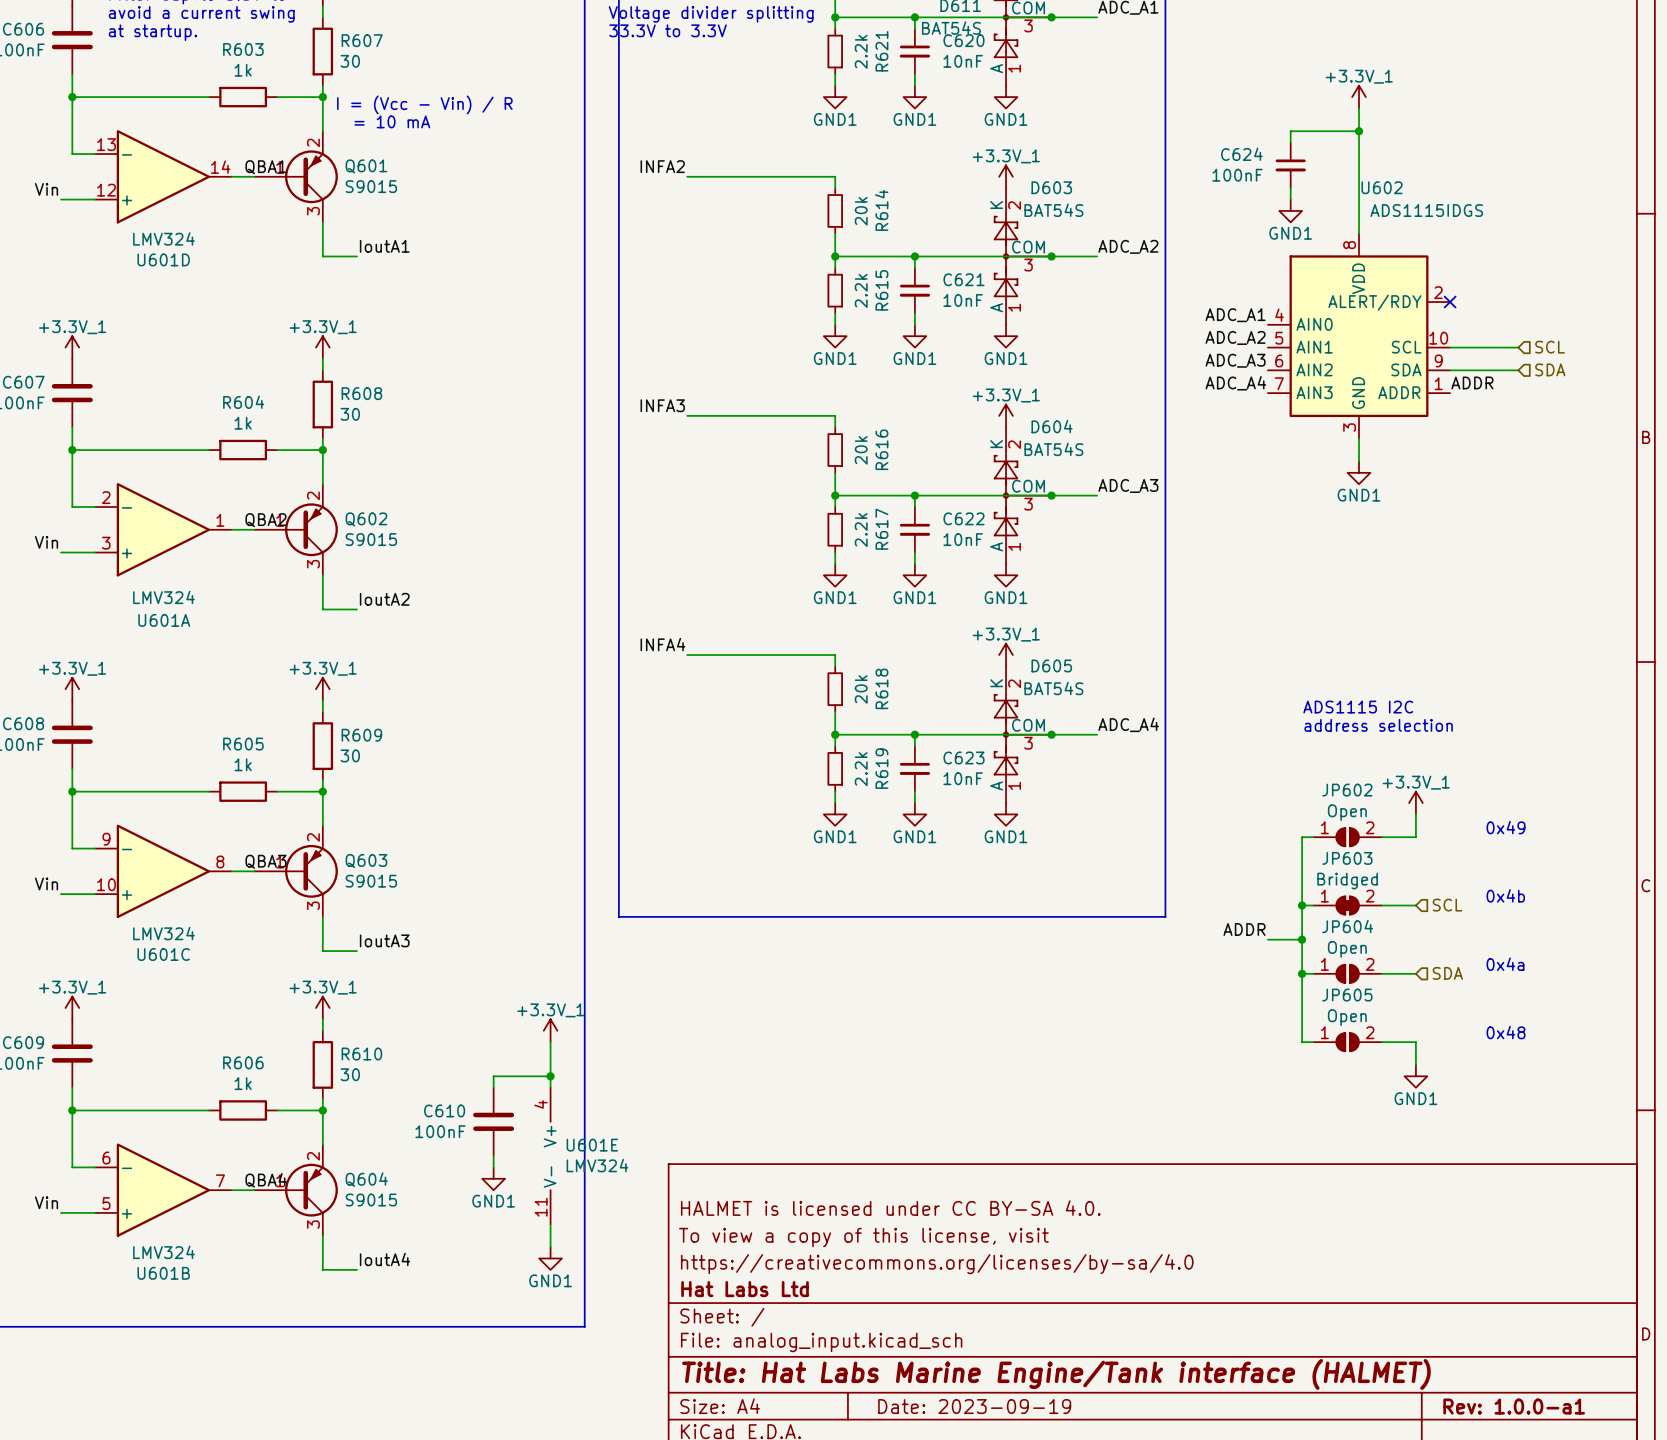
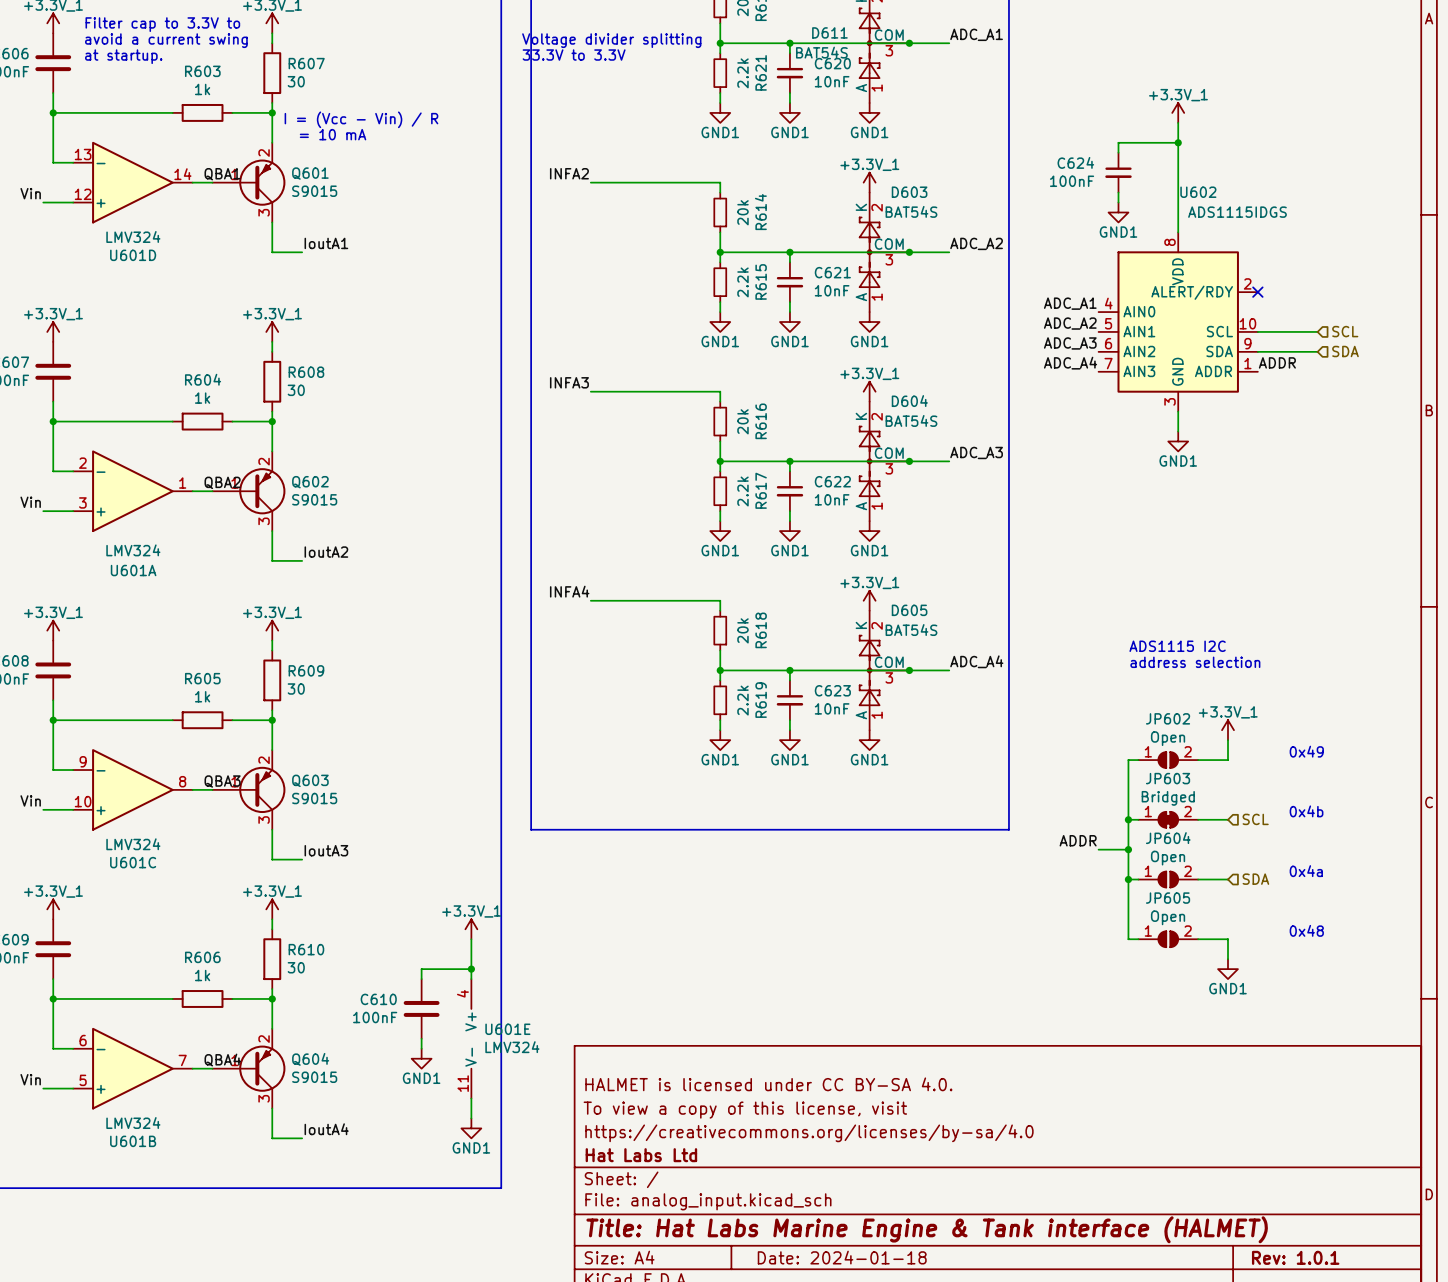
title block: Title: Hat Labs Marine Engine/Tank interface (HALMET) (1056, 1374) -> Title: Hat Labs Marine Engine & Tank interface (HALMET) (927, 1229)
title block: Date: 2023-09-19 (974, 1406) -> Date: 2024-01-18 (842, 1257)
title block: Rev: 1.0.0-a1 (1514, 1406) -> Rev: 1.0.1 (1295, 1257)

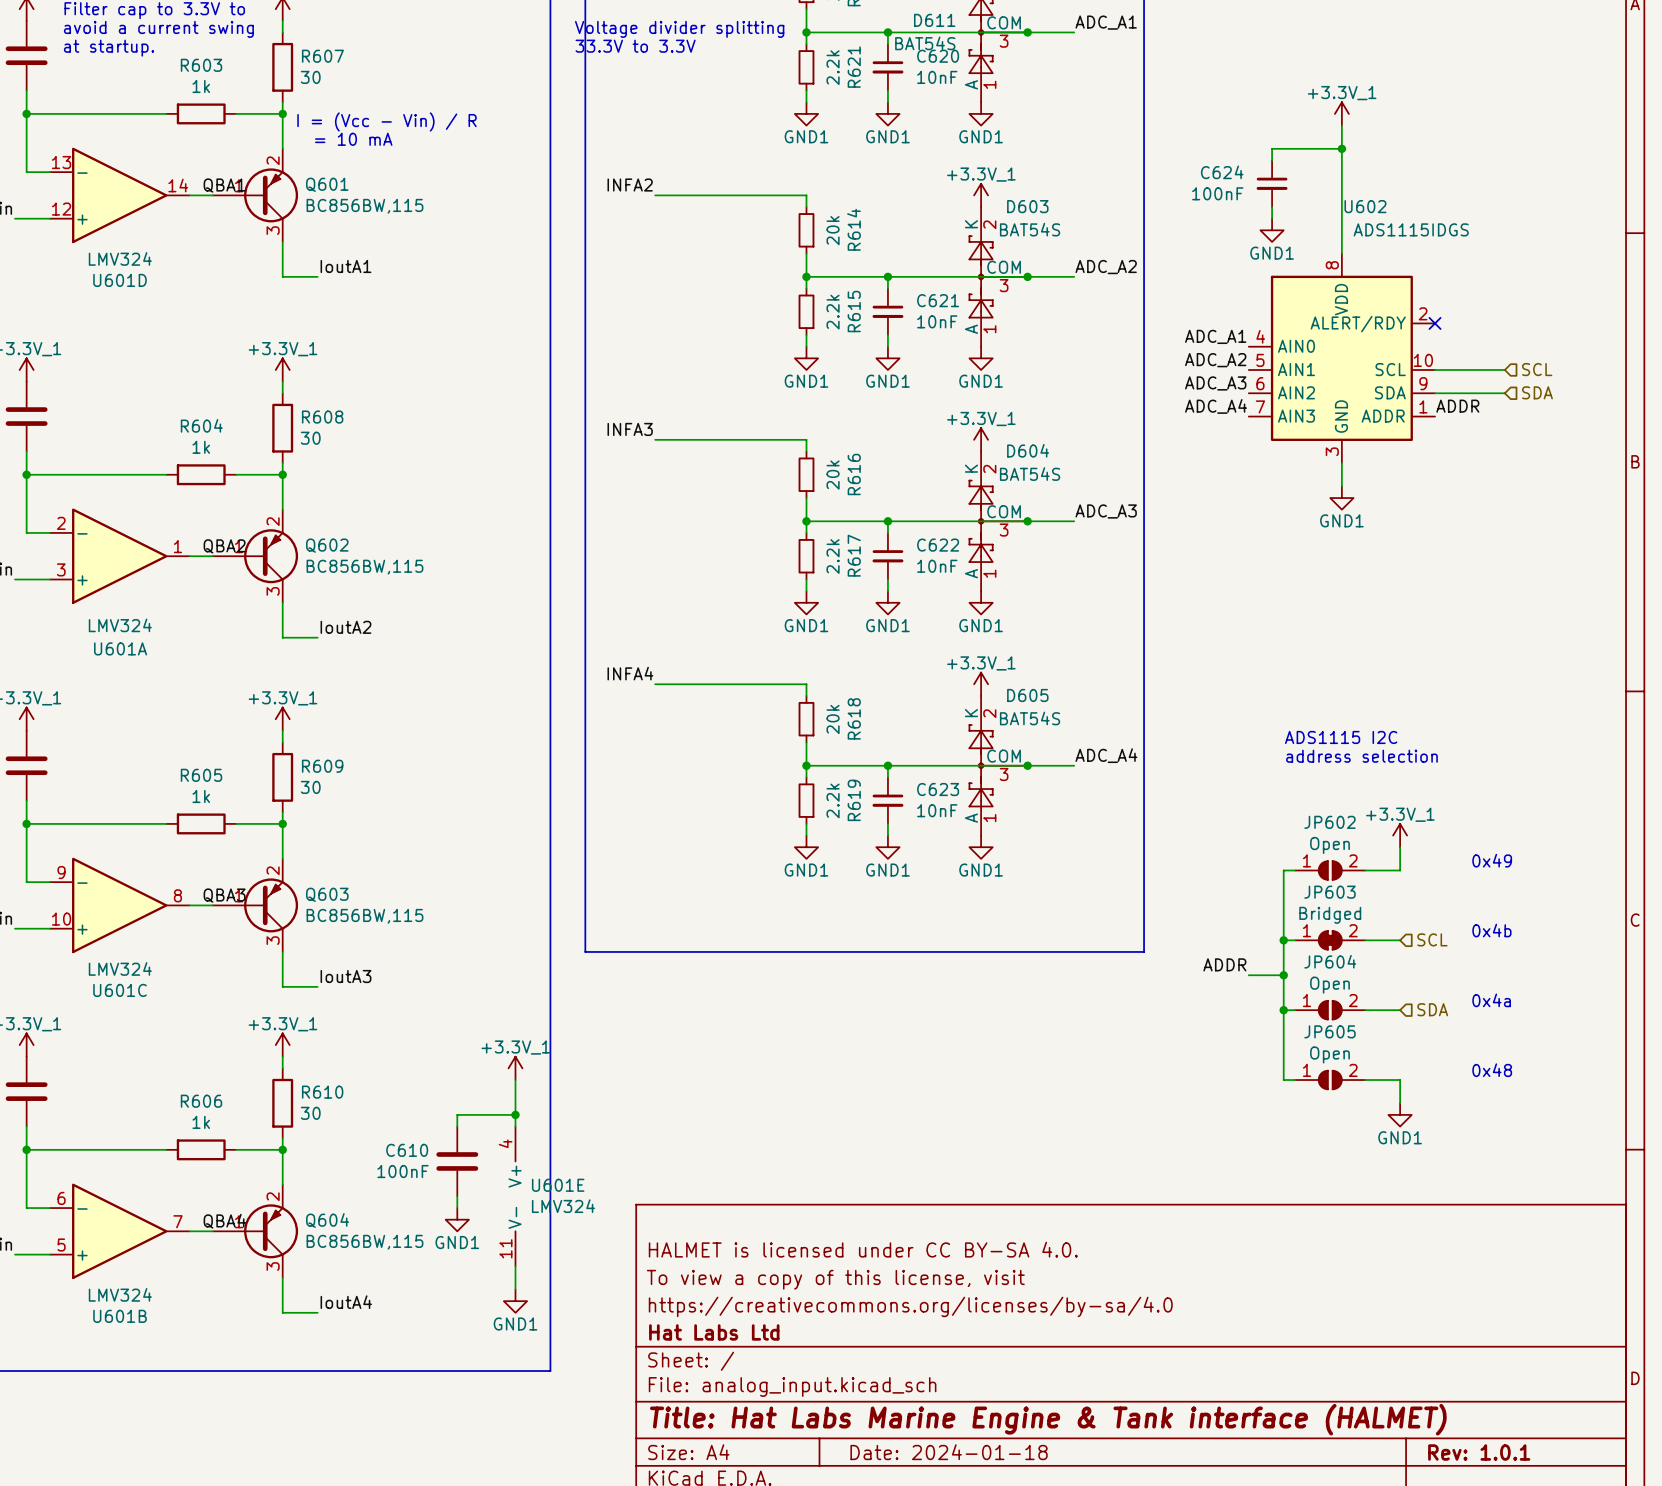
Q601 value: S9015 (314, 191) -> BC856BW,115 (364, 206)
Q602 value: S9015 (314, 499) -> BC856BW,115 (364, 567)
Q603 value: S9015 (314, 798) -> BC856BW,115 (364, 916)
Q604 value: S9015 (314, 1077) -> BC856BW,115 (364, 1242)

